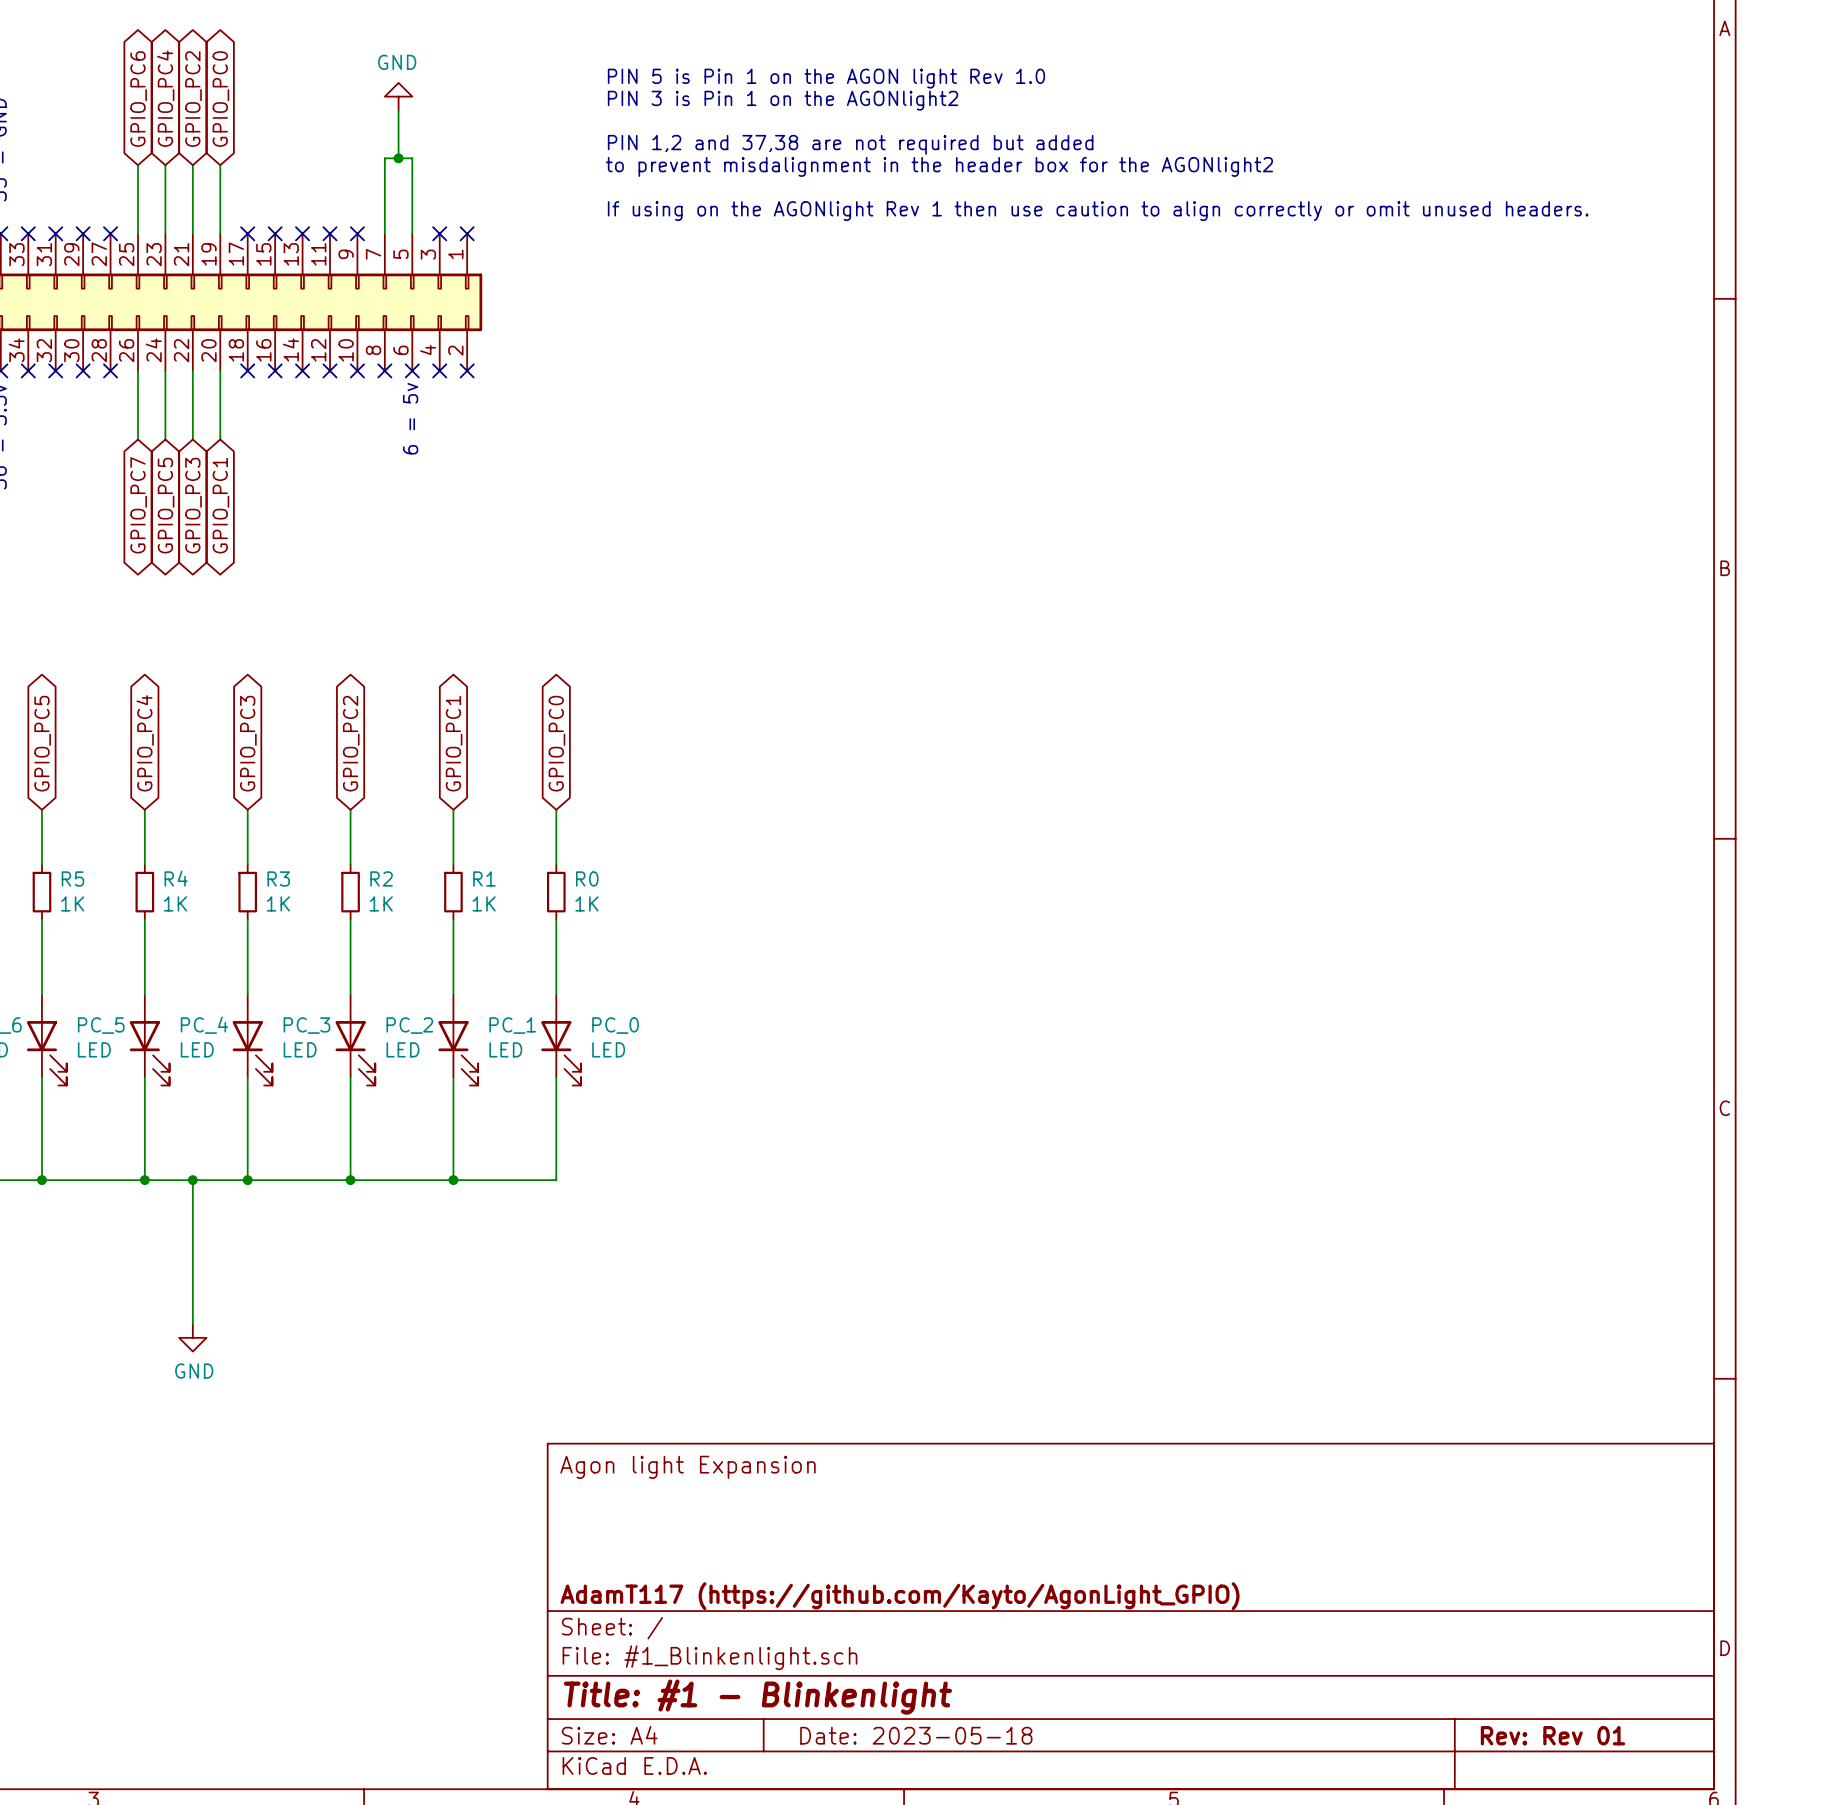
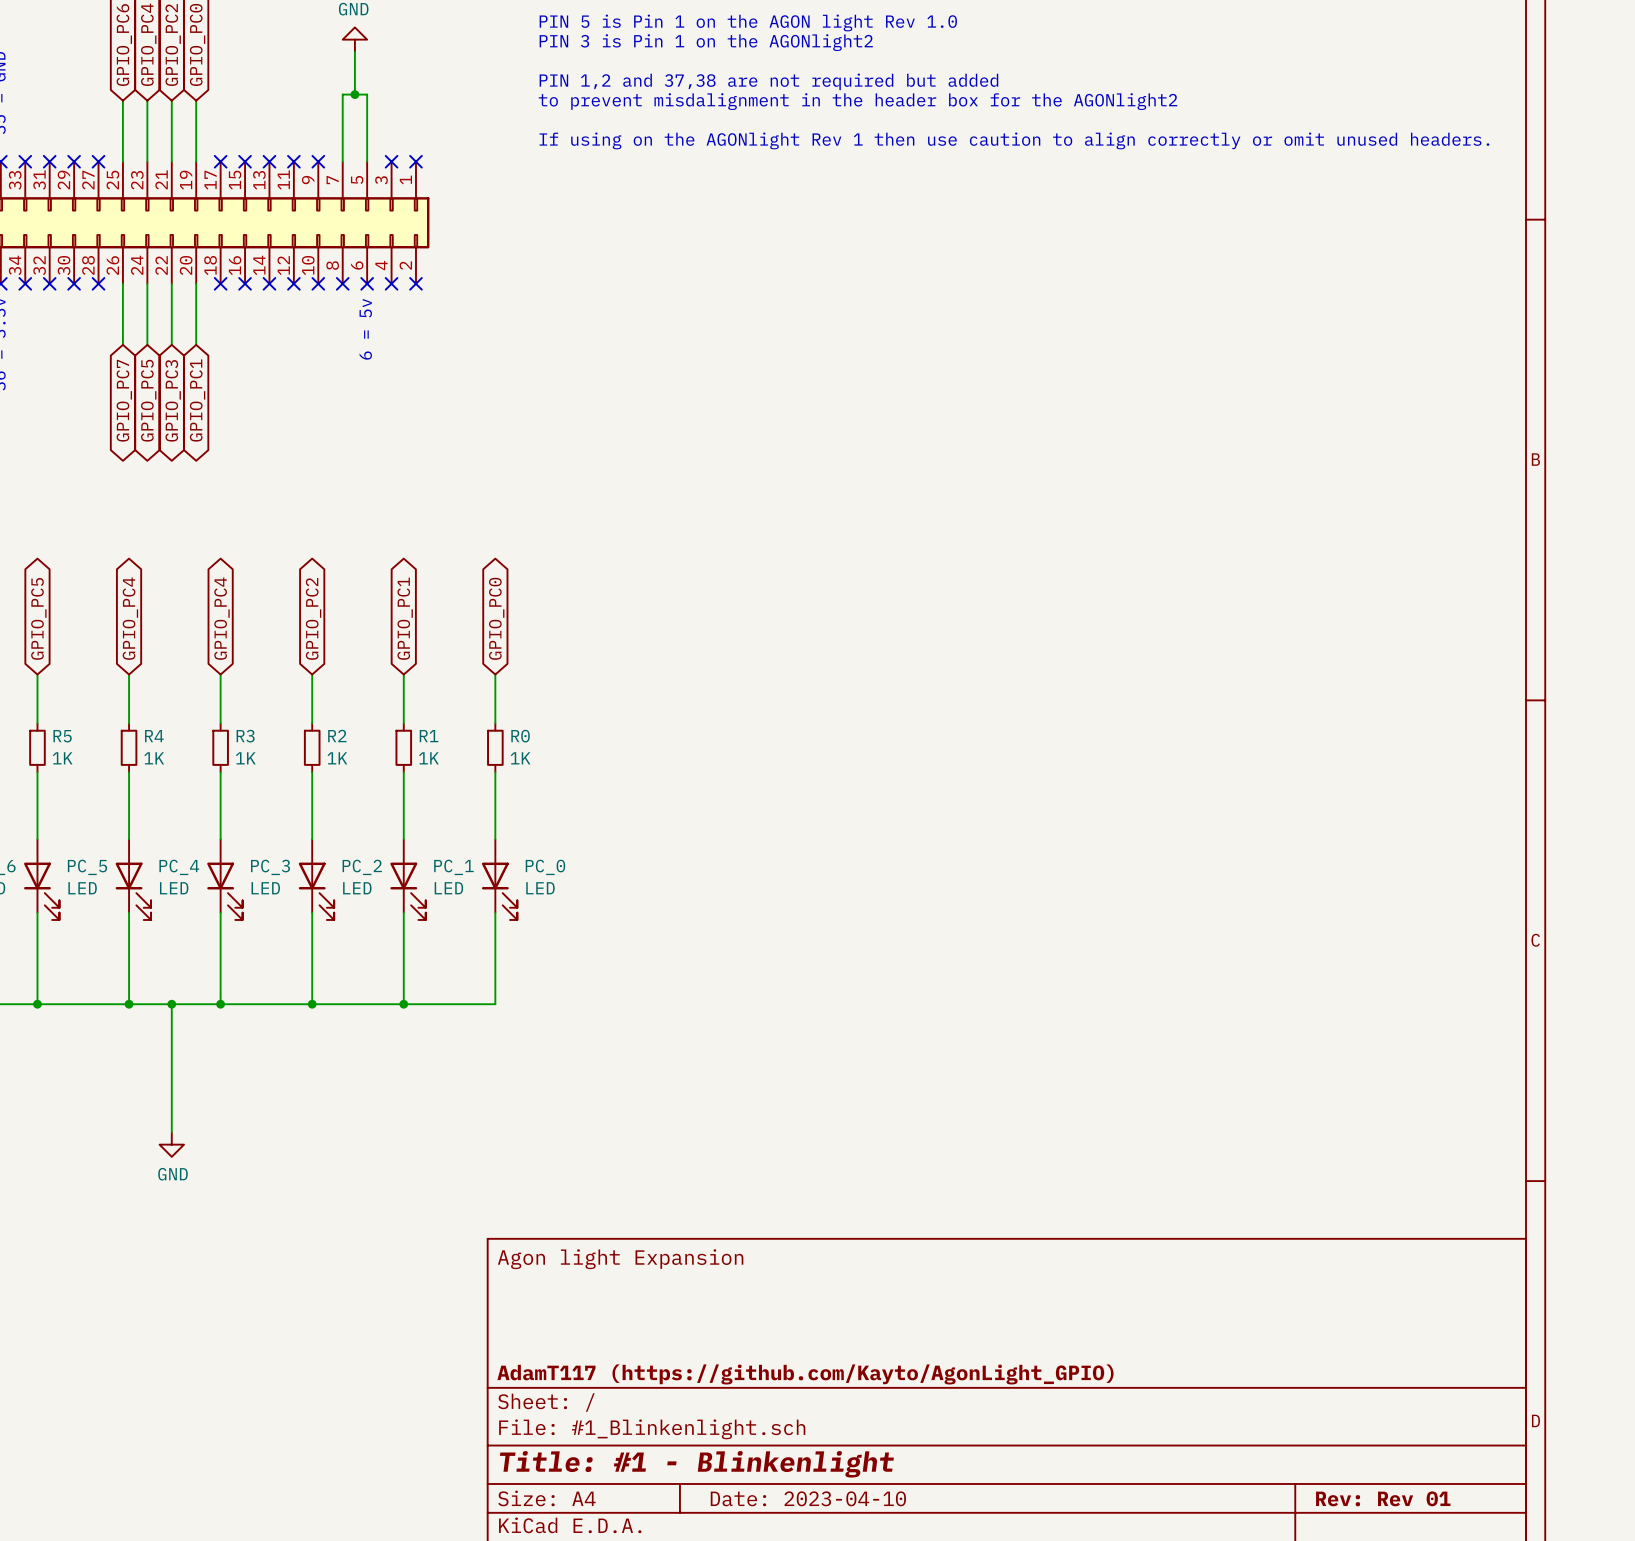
global label: GPIO_PC3 (248, 743) -> GPIO_PC4 (222, 618)
title block: Date: 2023-05-18 (916, 1735) -> Date: 2023-04-10 (808, 1498)

